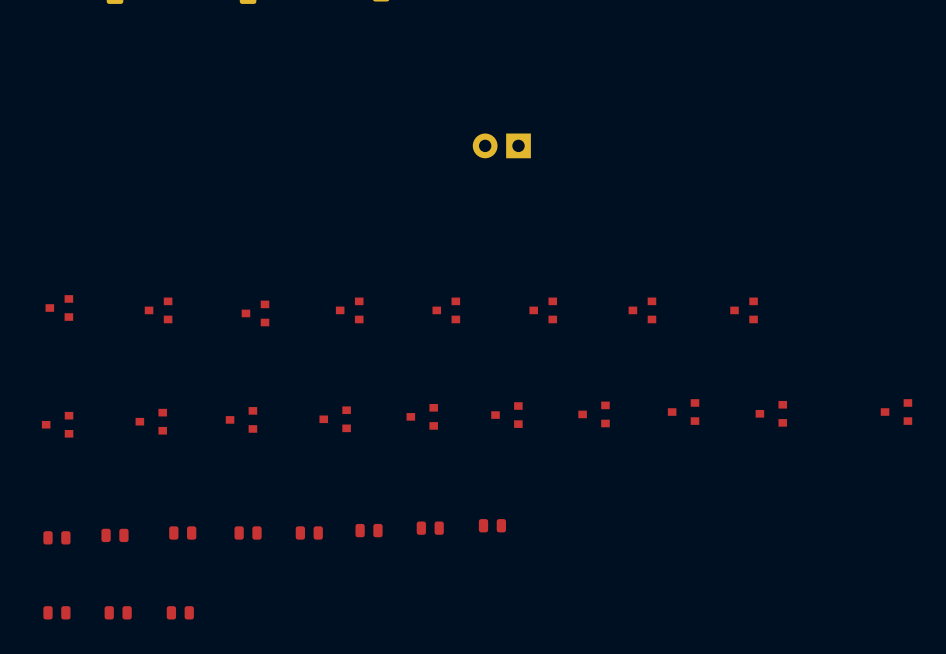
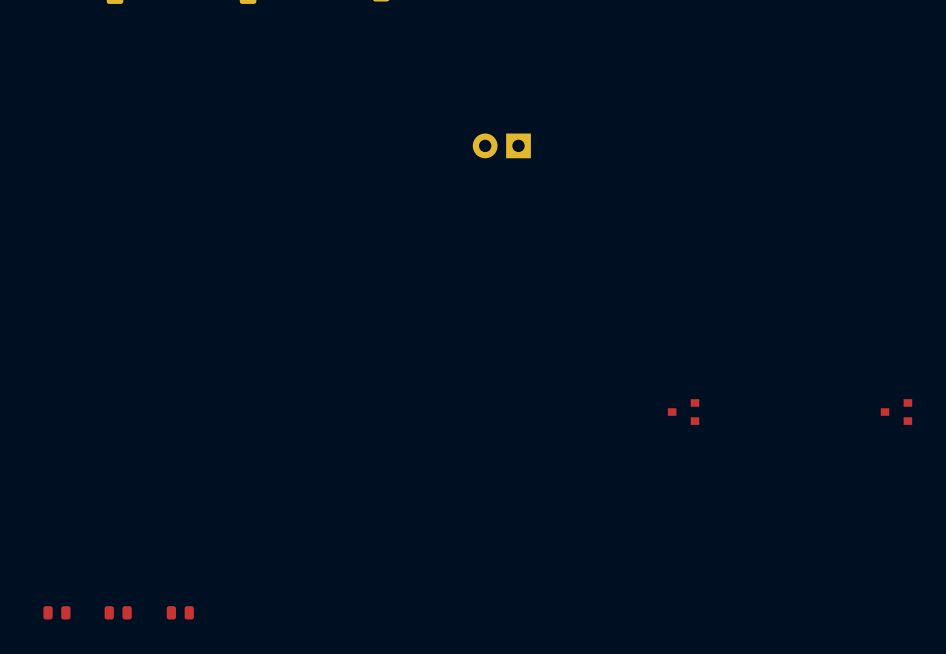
part: (59, 307) -> none
part: (158, 310) -> none
part: (349, 310) -> none
part: (446, 310) -> none
part: (543, 310) -> none
part: (642, 310) -> none
part: (744, 310) -> none
part: (255, 313) -> none
part: (771, 413) -> none
part: (594, 414) -> none
part: (506, 415) -> none
part: (422, 416) -> none
part: (241, 419) -> none
part: (335, 419) -> none
part: (151, 421) -> none
part: (57, 424) -> none
part: (492, 525) -> none
part: (430, 528) -> none
part: (369, 530) -> none
part: (182, 532) -> none
part: (248, 532) -> none
part: (309, 532) -> none
part: (115, 535) -> none
part: (56, 537) -> none

